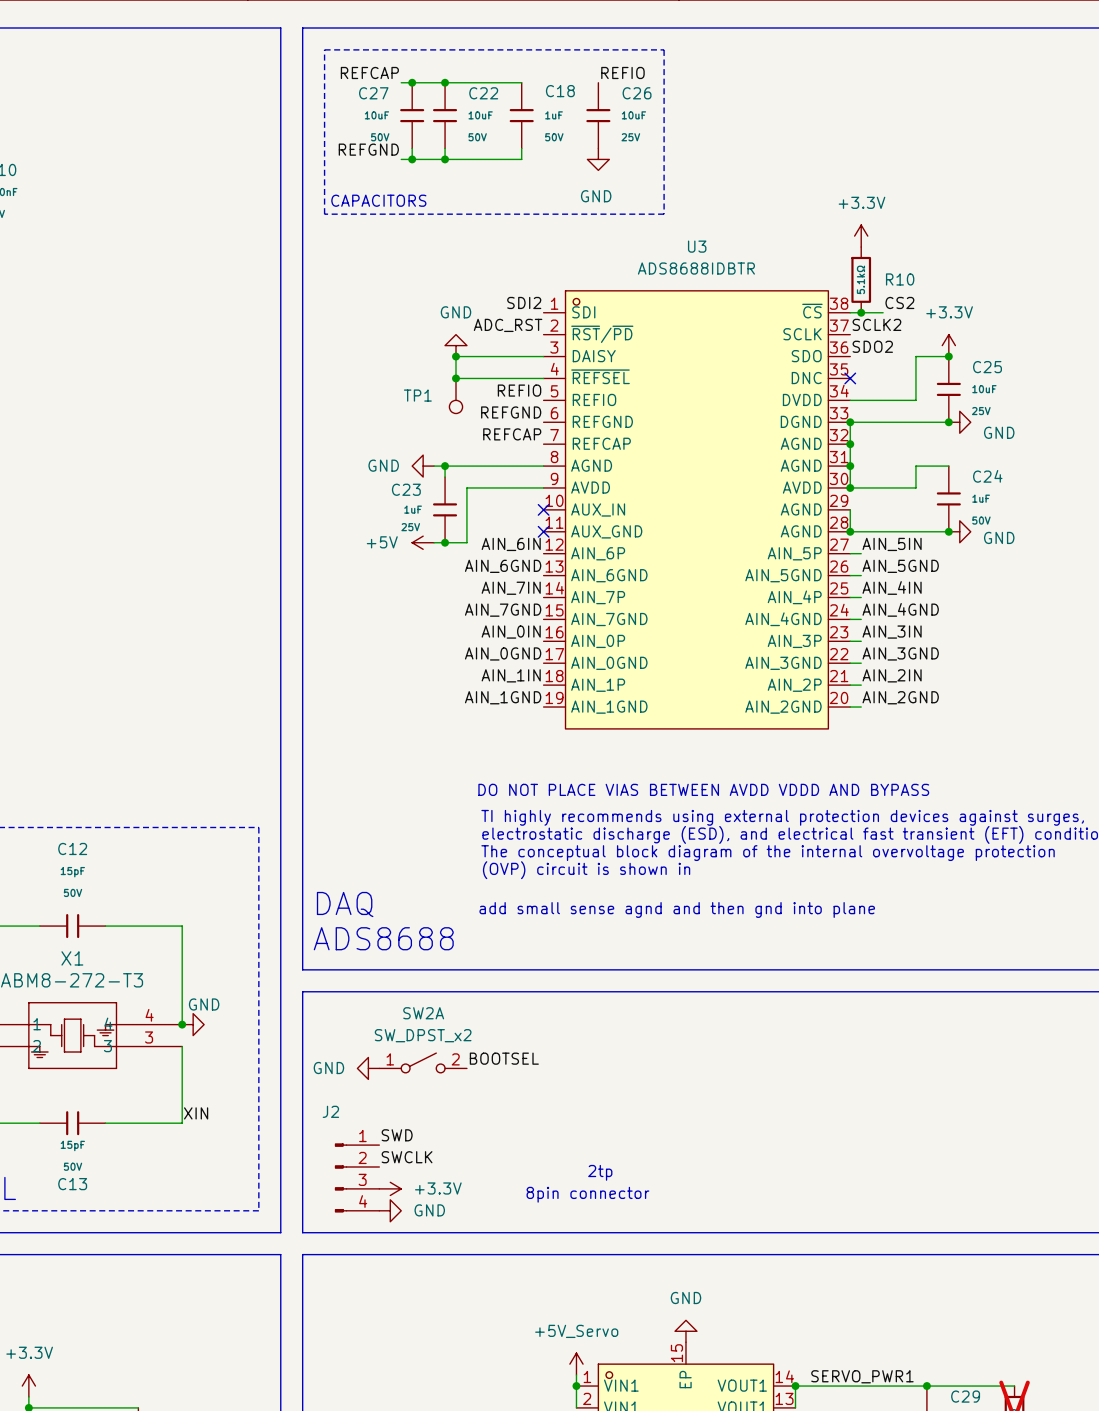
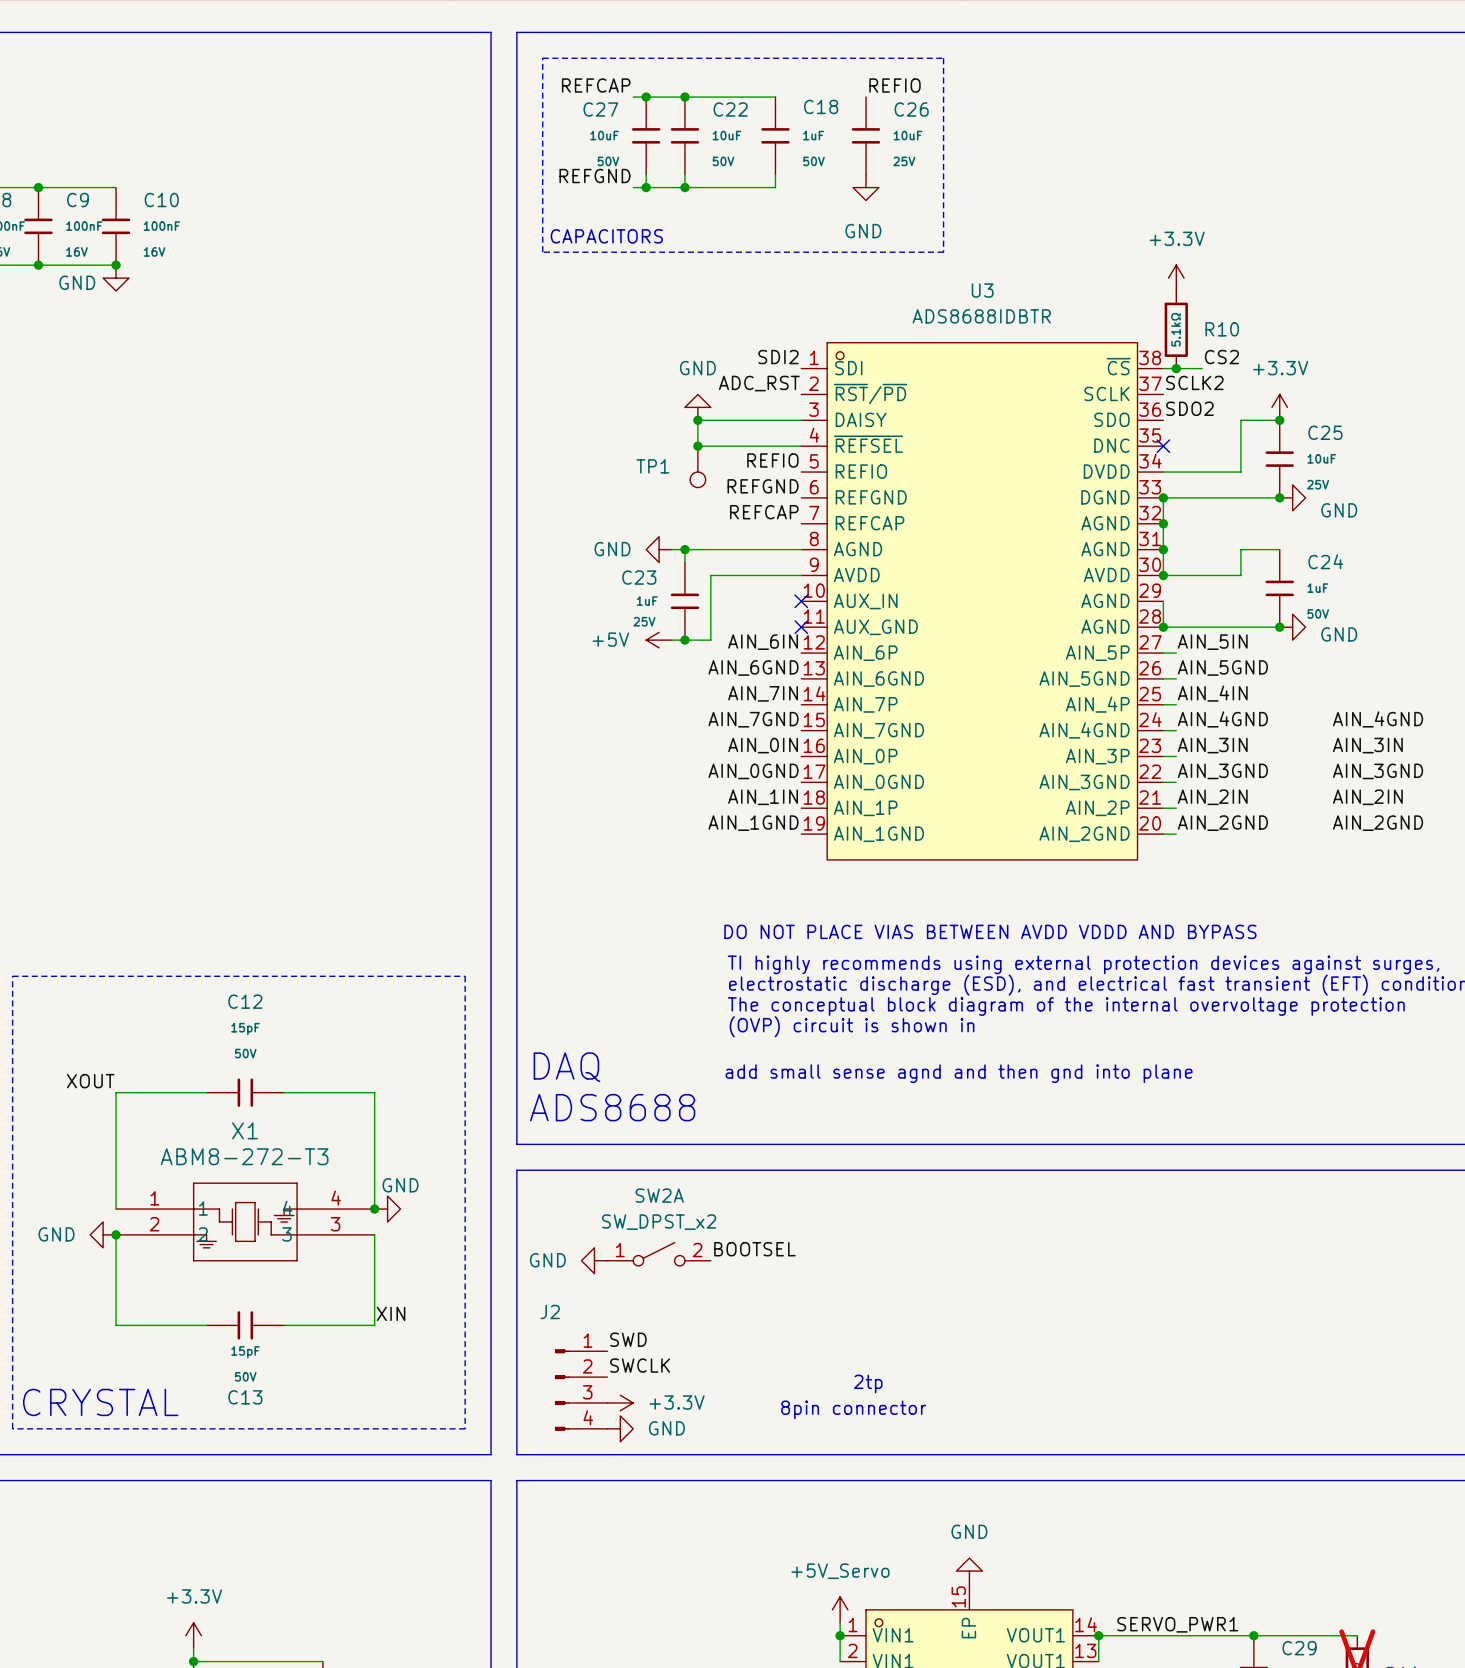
label: none -> AIN_4GND (1378, 719)
label: none -> AIN_3IN (1367, 745)
label: none -> AIN_3GND (1378, 771)
label: none -> AIN_2IN (1367, 797)
label: none -> AIN_2GND (1378, 823)

